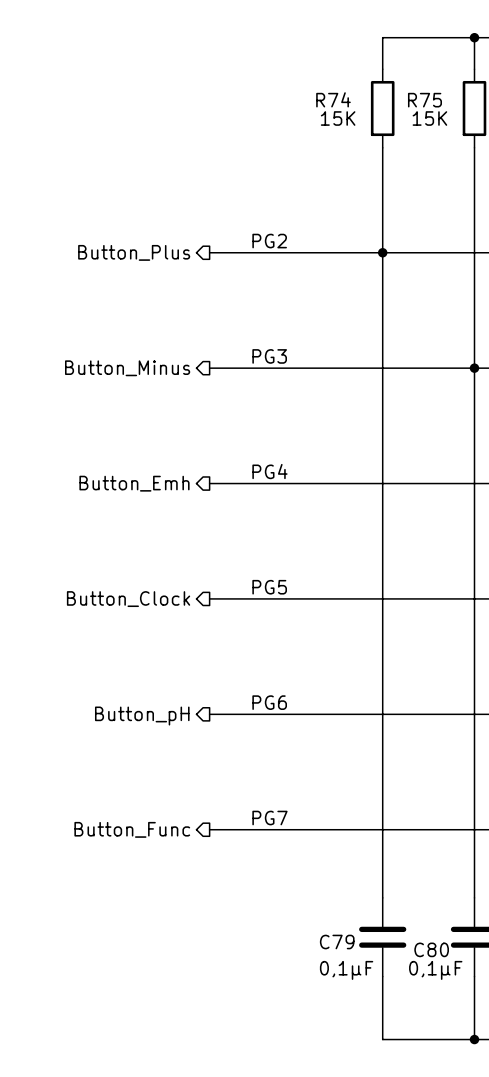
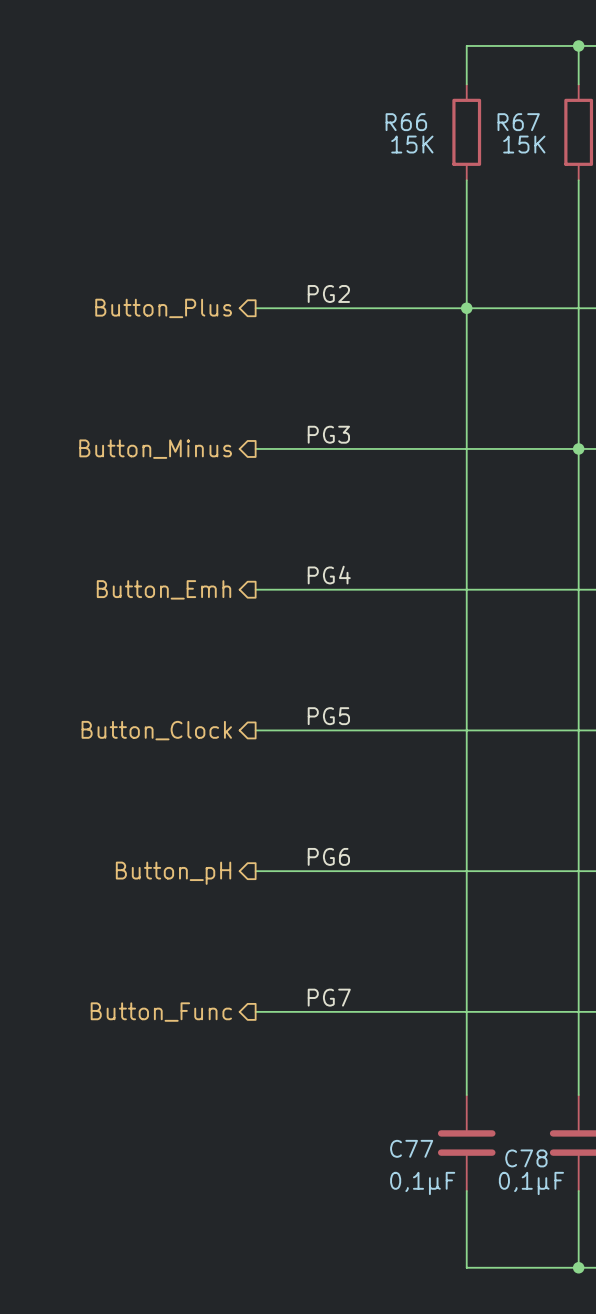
R74 name: R74 (333, 99) -> R66 (406, 122)
R75 name: R75 (424, 100) -> R67 (518, 122)
C79 name: C79 (337, 942) -> C77 (411, 1148)
C80 name: C80 (431, 949) -> C78 (526, 1158)

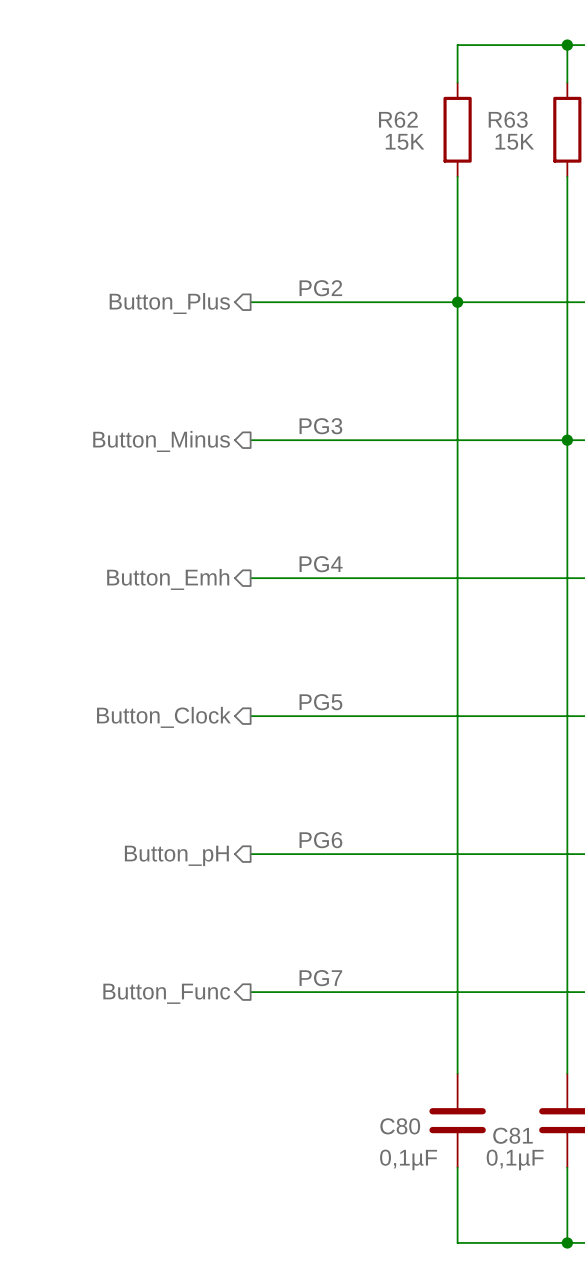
R66 name: R66 (406, 122) -> R62 (398, 119)
R67 name: R67 (518, 122) -> R63 (508, 119)
C77 name: C77 (411, 1148) -> C80 (400, 1126)
C78 name: C78 (526, 1158) -> C81 (513, 1135)

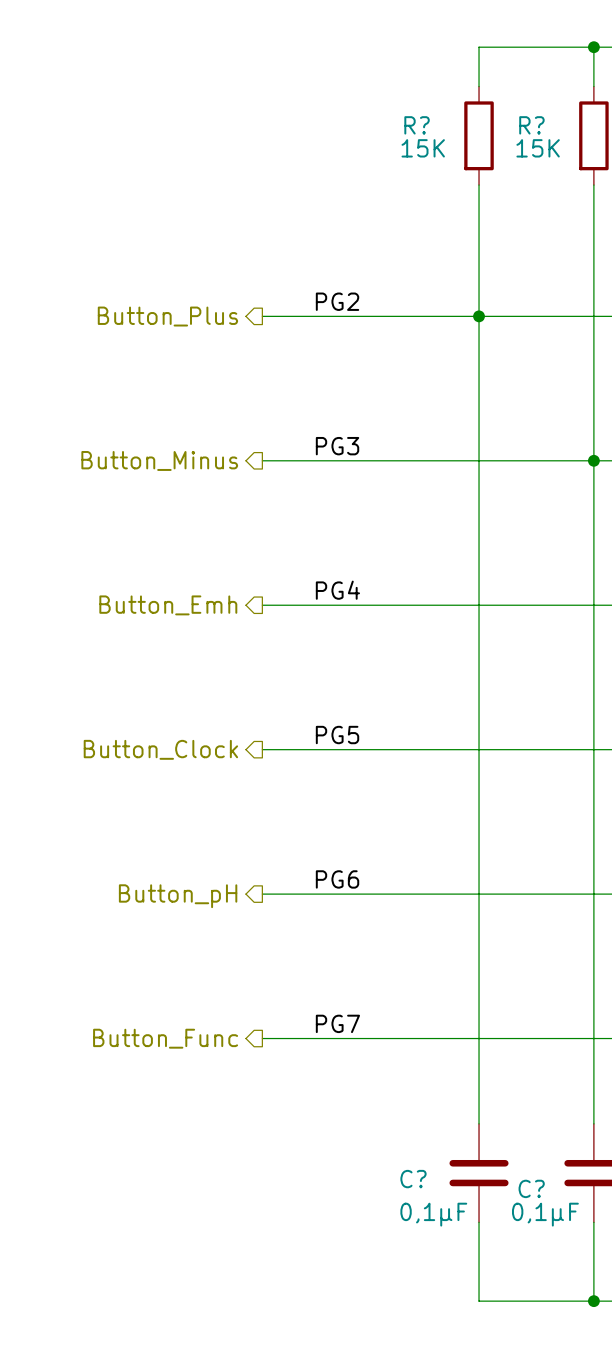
R62 name: R62 (398, 119) -> R? (417, 125)
R63 name: R63 (508, 119) -> R? (531, 125)
C80 name: C80 (400, 1126) -> C? (413, 1179)
C81 name: C81 (513, 1135) -> C? (531, 1188)

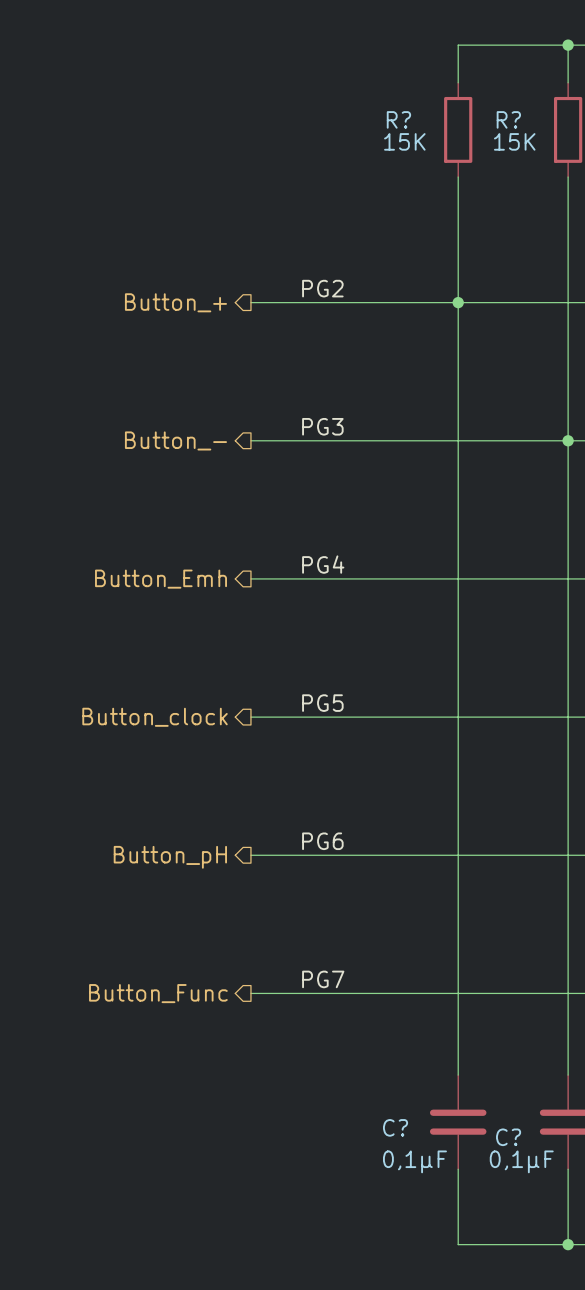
hierarchical label: Button_Plus (167, 316) -> Button_+ (175, 302)
hierarchical label: Button_Minus (159, 460) -> Button_- (175, 440)
hierarchical label: Button_Clock (160, 749) -> Button_clock (155, 717)

